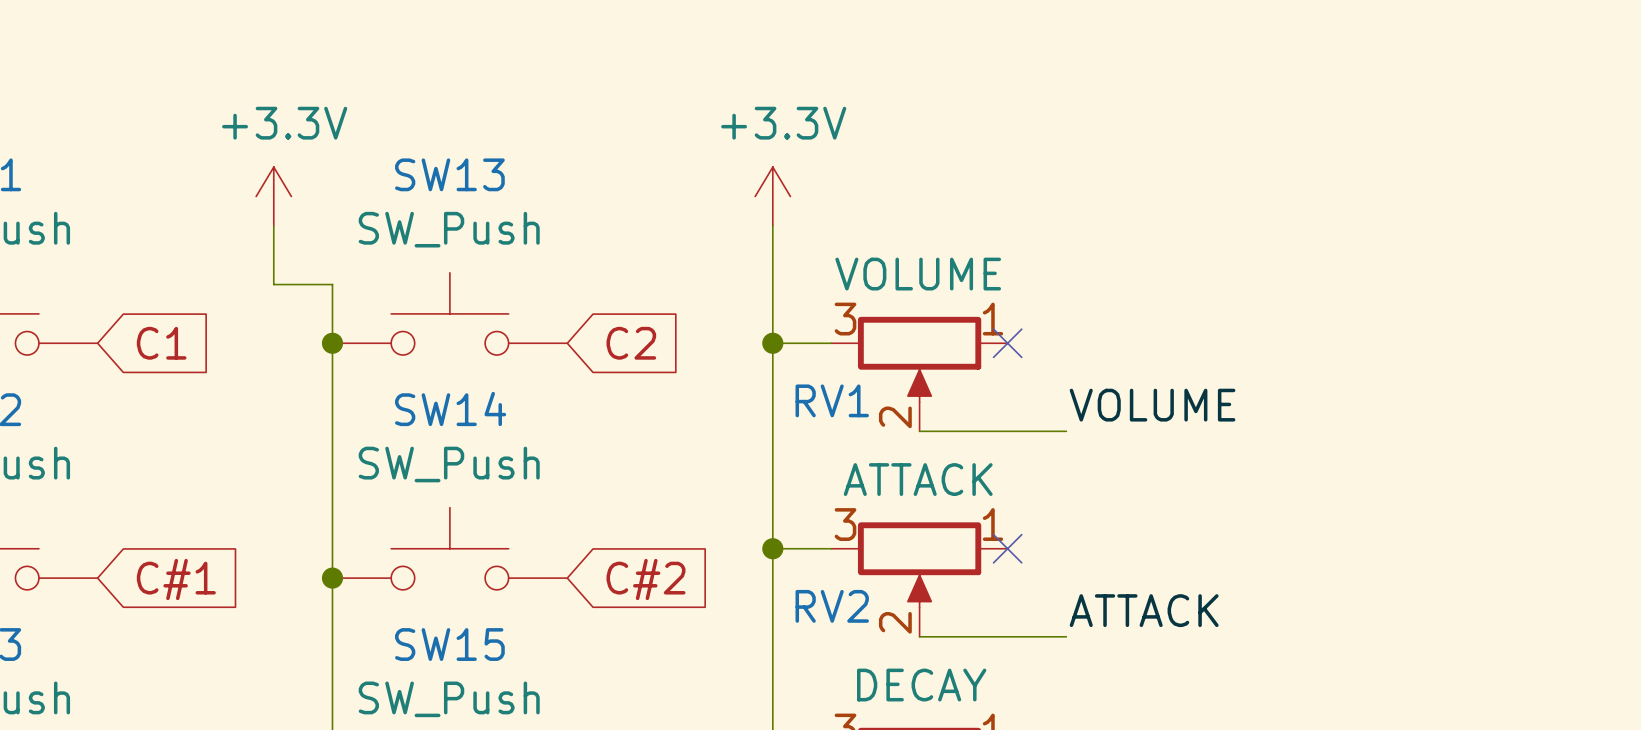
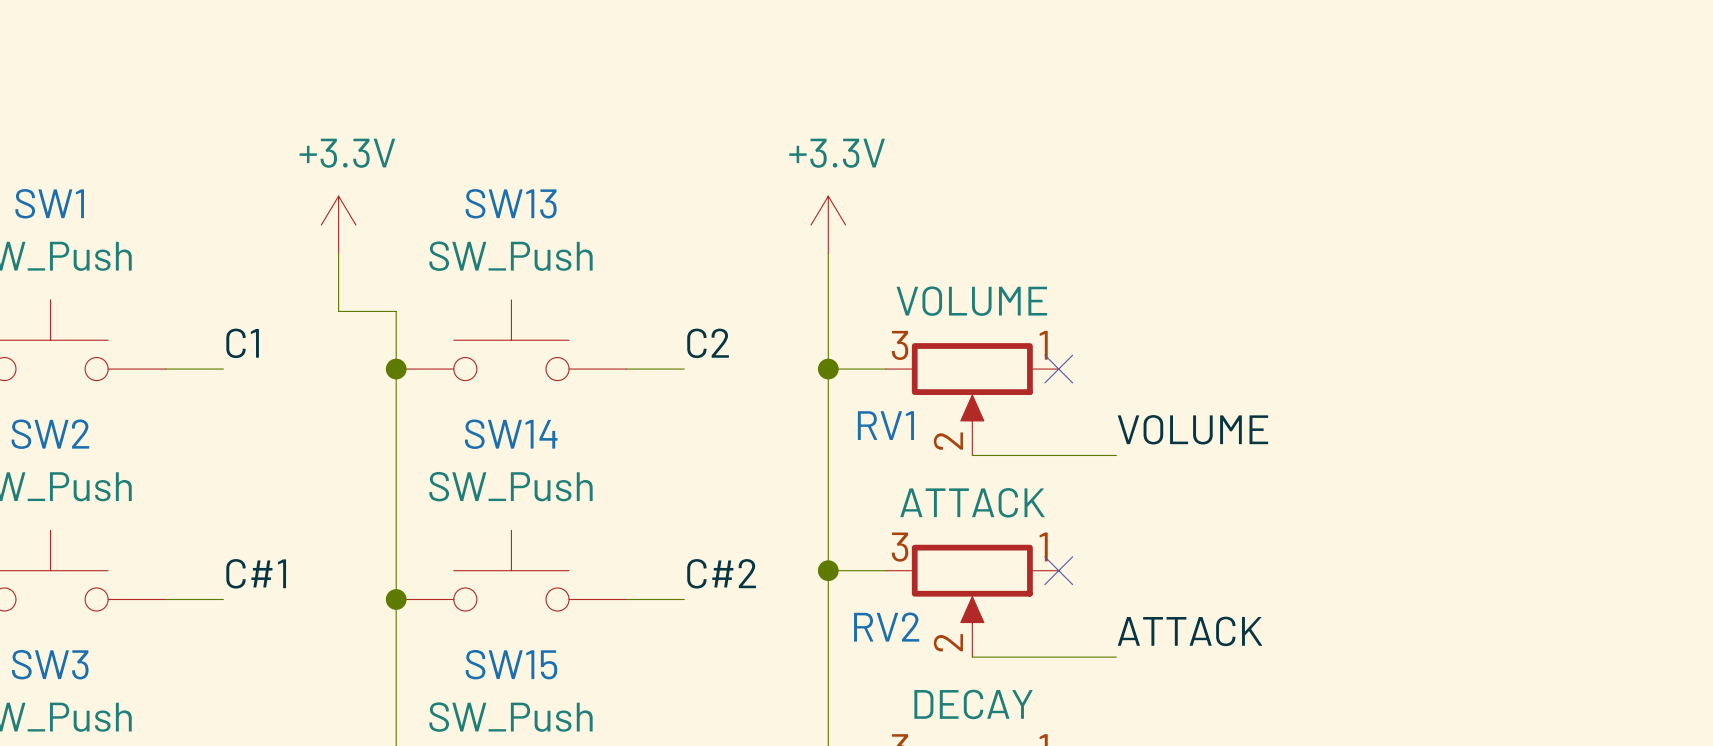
label: none -> C1 (242, 343)
label: none -> C2 (708, 343)
wire: none -> (165, 369) (223, 369)
global label: C1 (161, 343) -> none
wire: none -> (626, 369) (684, 369)
global label: C2 (631, 343) -> none
label: none -> C#1 (256, 573)
label: none -> C#2 (721, 573)
wire: none -> (165, 599) (223, 599)
wire: none -> (626, 599) (684, 599)
global label: C#1 (176, 579) -> none
global label: C#2 (646, 579) -> none

